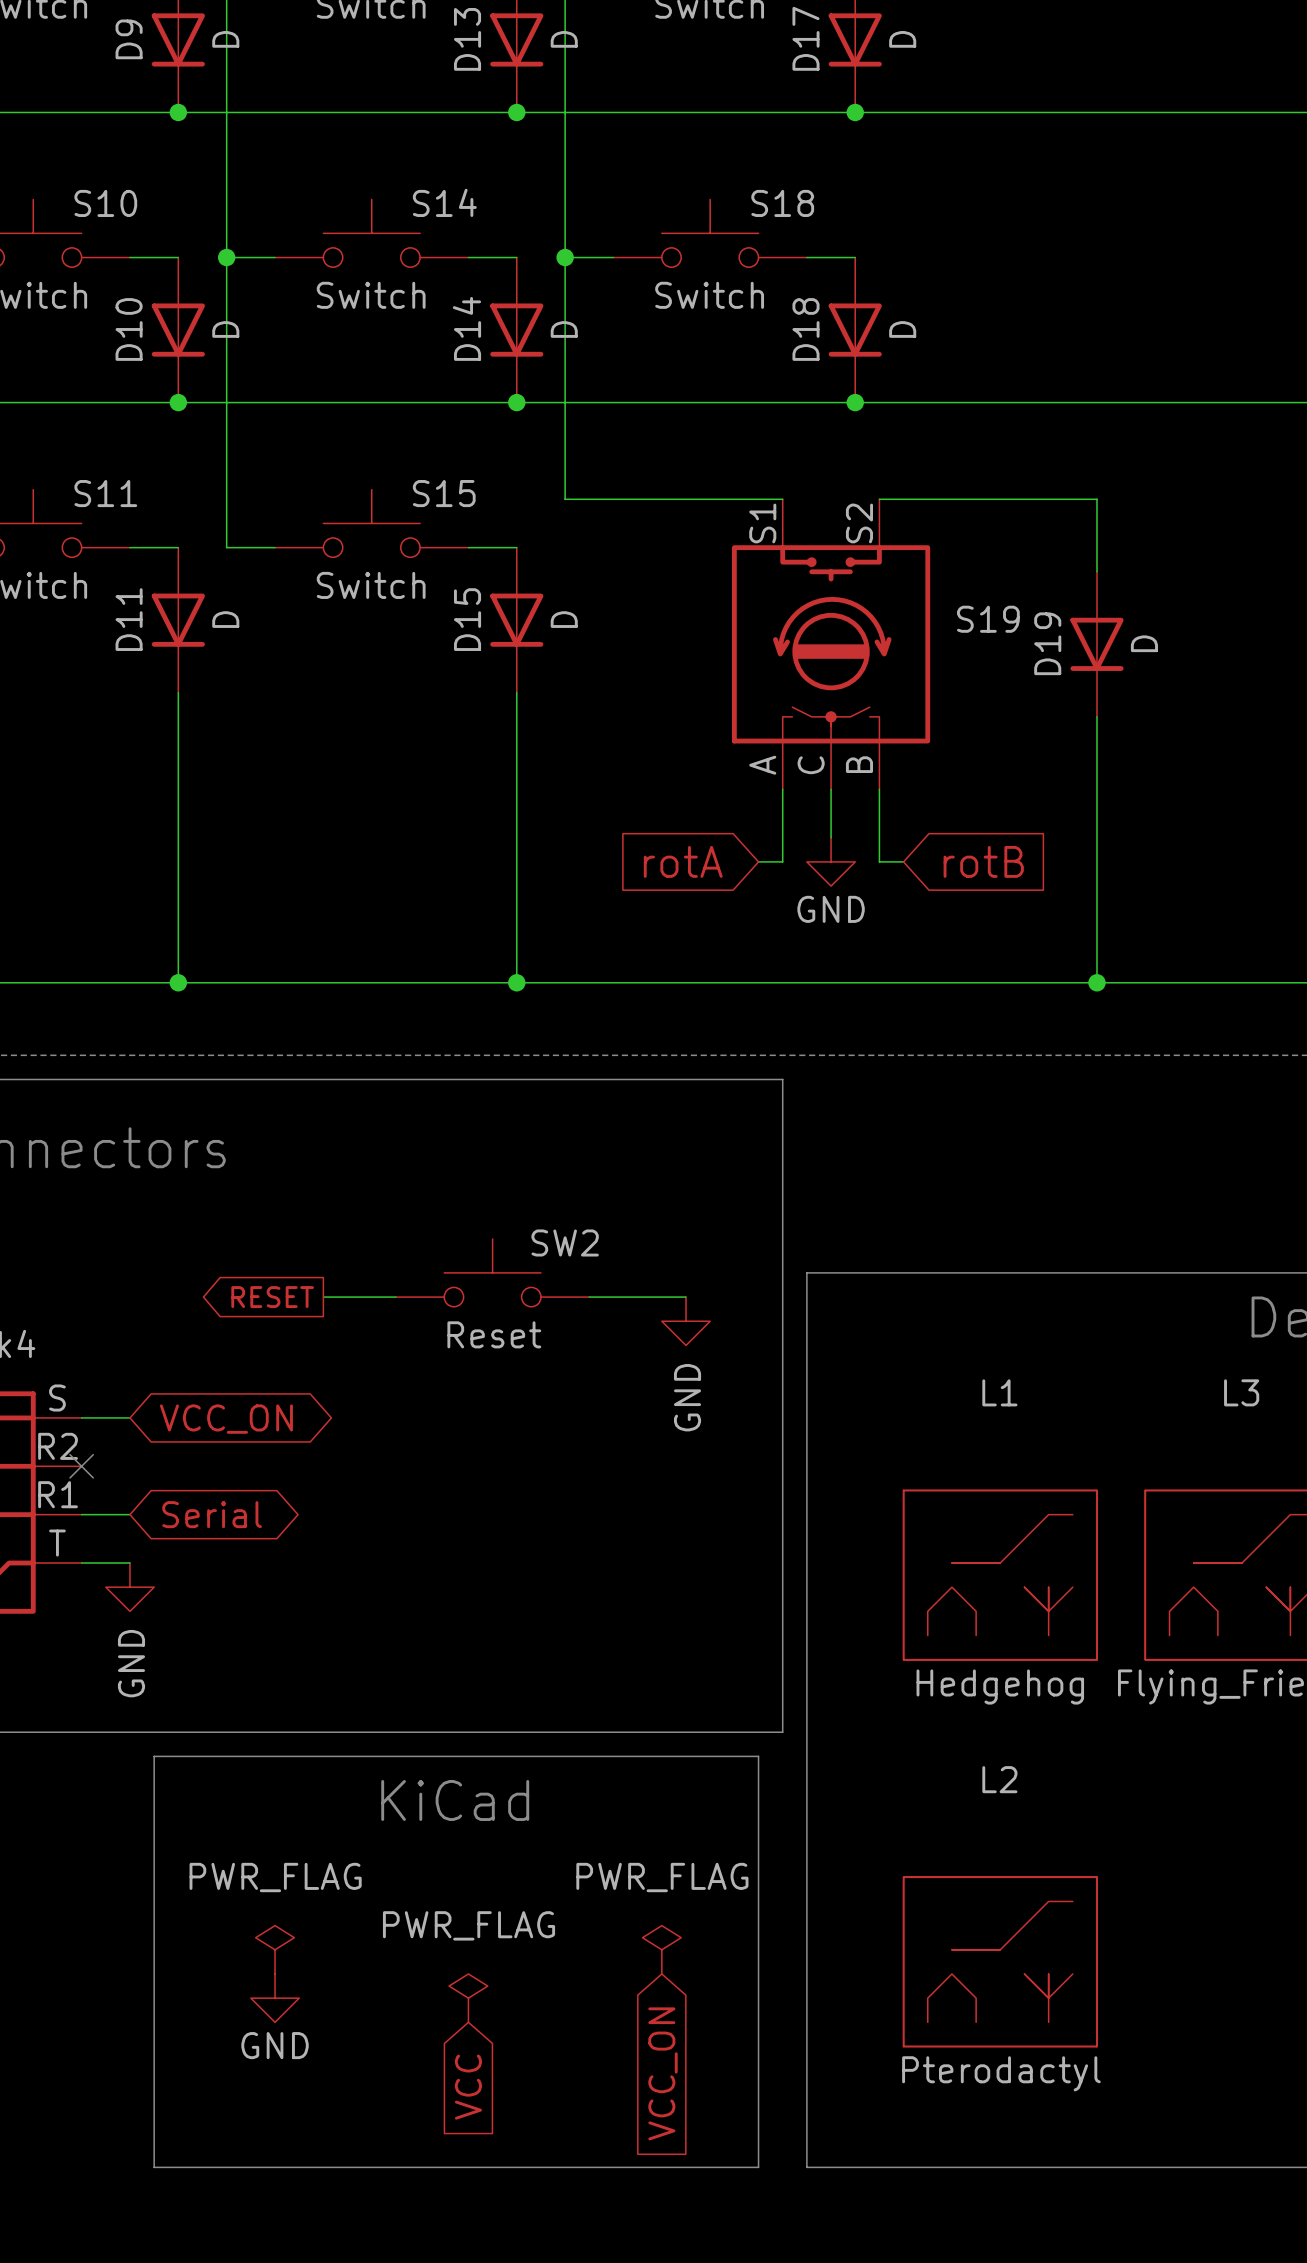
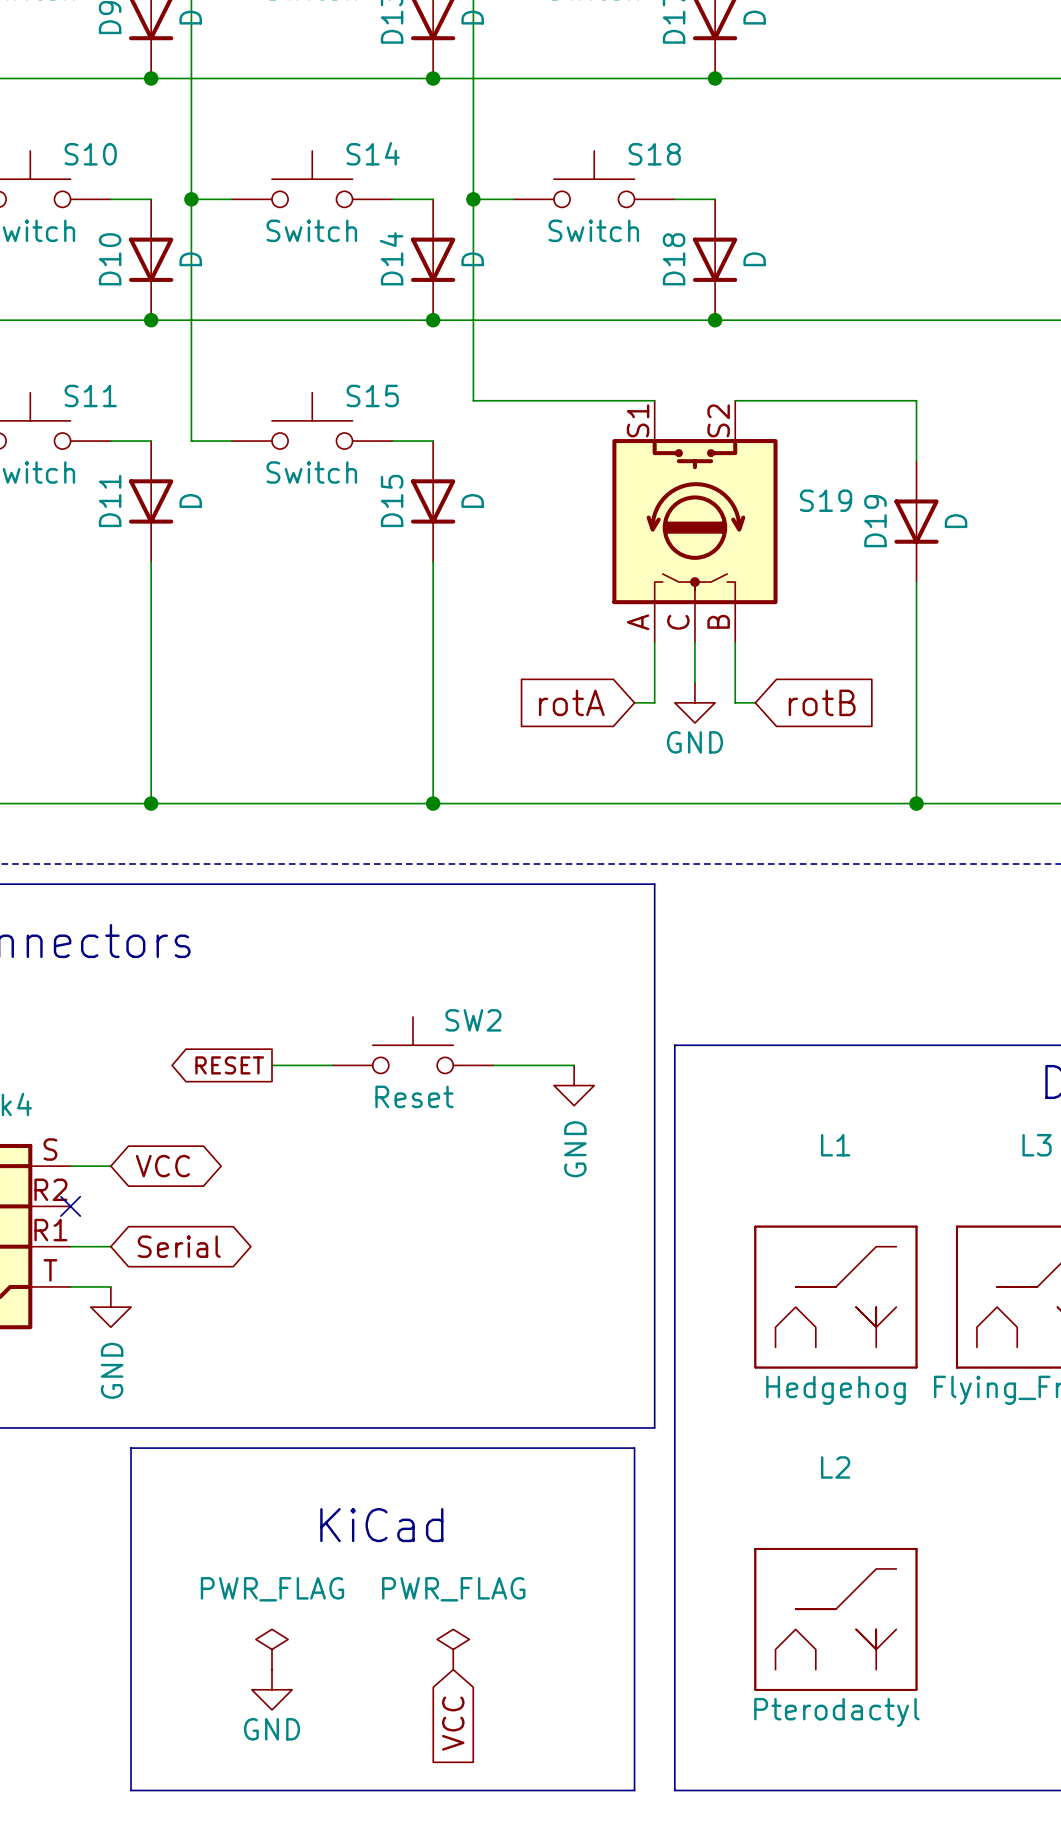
global label: VCC_ON (226, 1419) -> VCC (162, 1166)
text position: KiCad (455, 1800) -> KiCad (381, 1525)
power symbol position: PWR_FLAG (275, 1949) -> PWR_FLAG (272, 1649)
power symbol: PWR_FLAG (661, 1949) -> none
power symbol position: GND (275, 1998) -> GND (272, 1689)
power symbol: PWR_FLAG (468, 1998) -> none
power symbol: none -> PWR_FLAG (453, 1649)
global label: VCC_ON (662, 2073) -> none
global label position: VCC (468, 2087) -> VCC (453, 1723)

